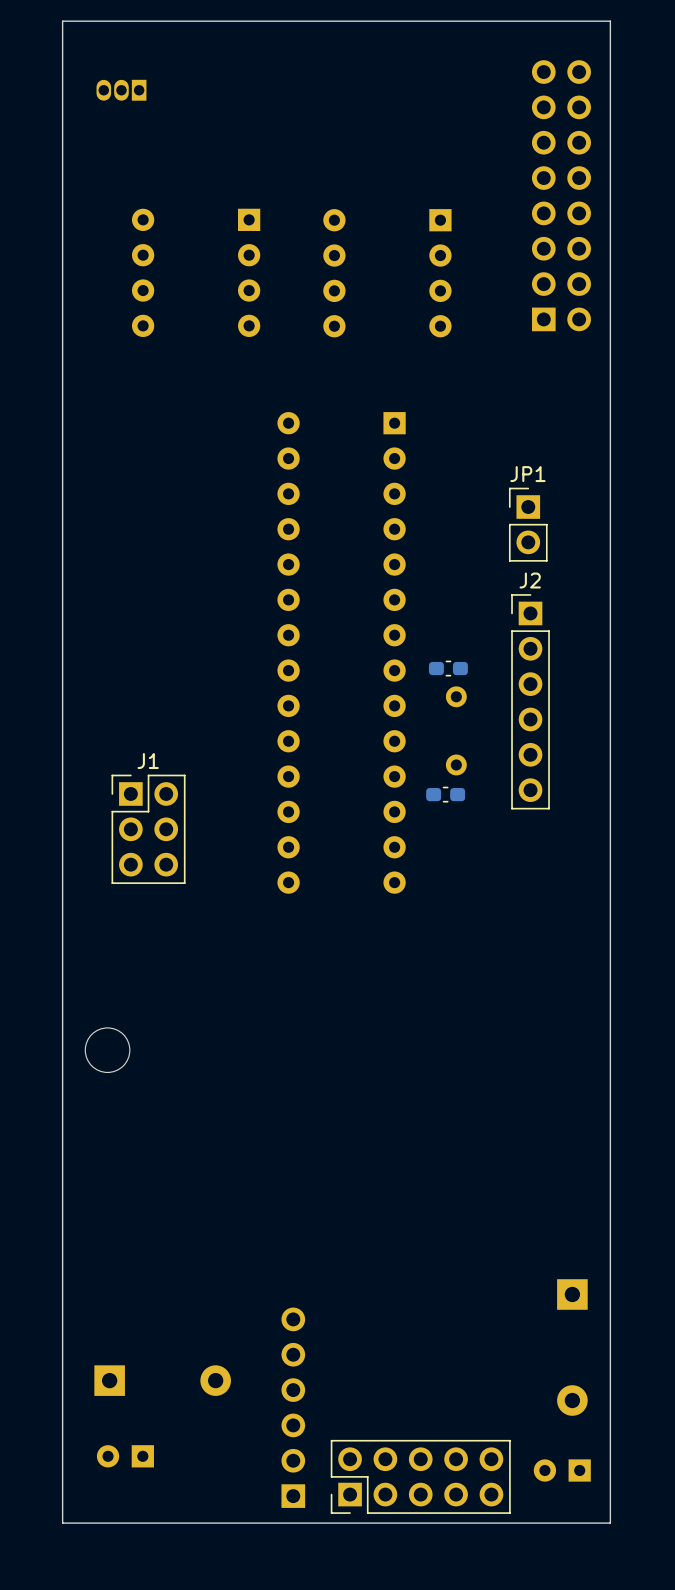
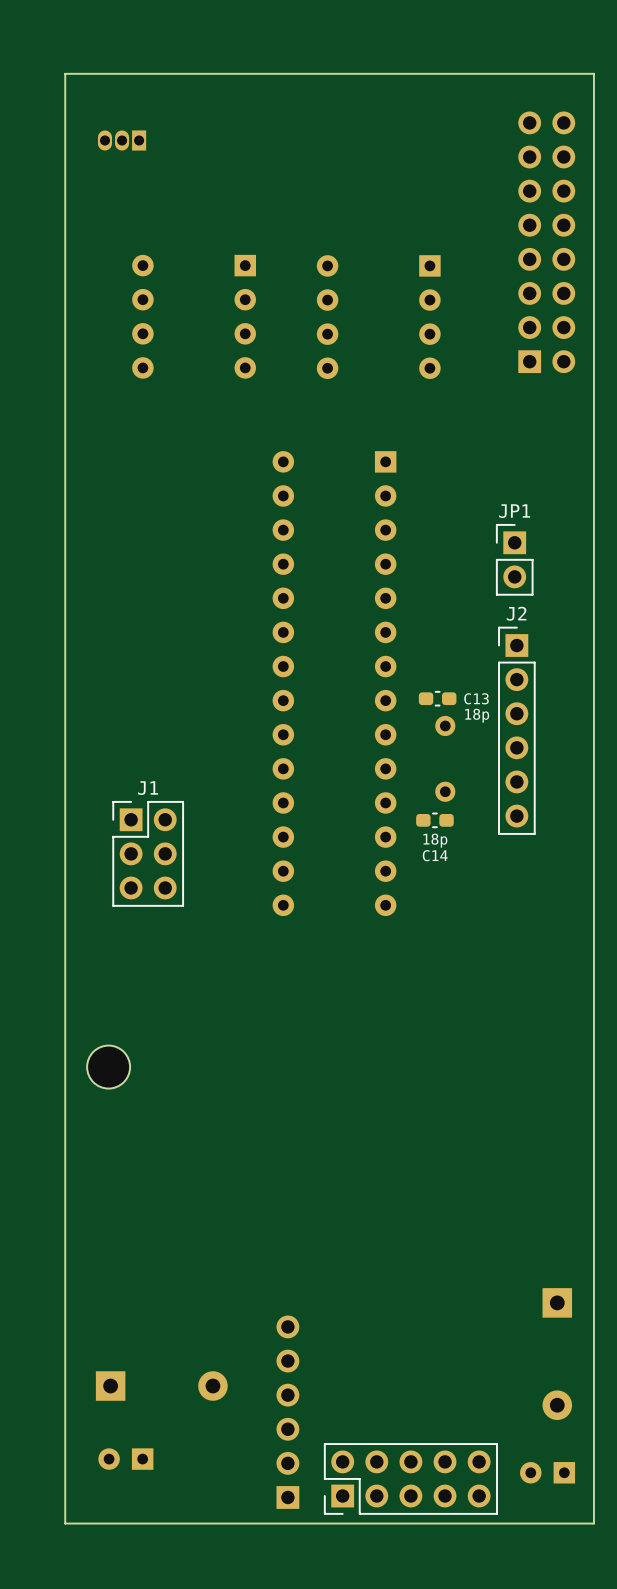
C13 name: none -> C13 (476, 698)
C13 value: none -> 18p (477, 715)
C14 value: none -> 18p (435, 840)
C14 name: none -> C14 (435, 855)

